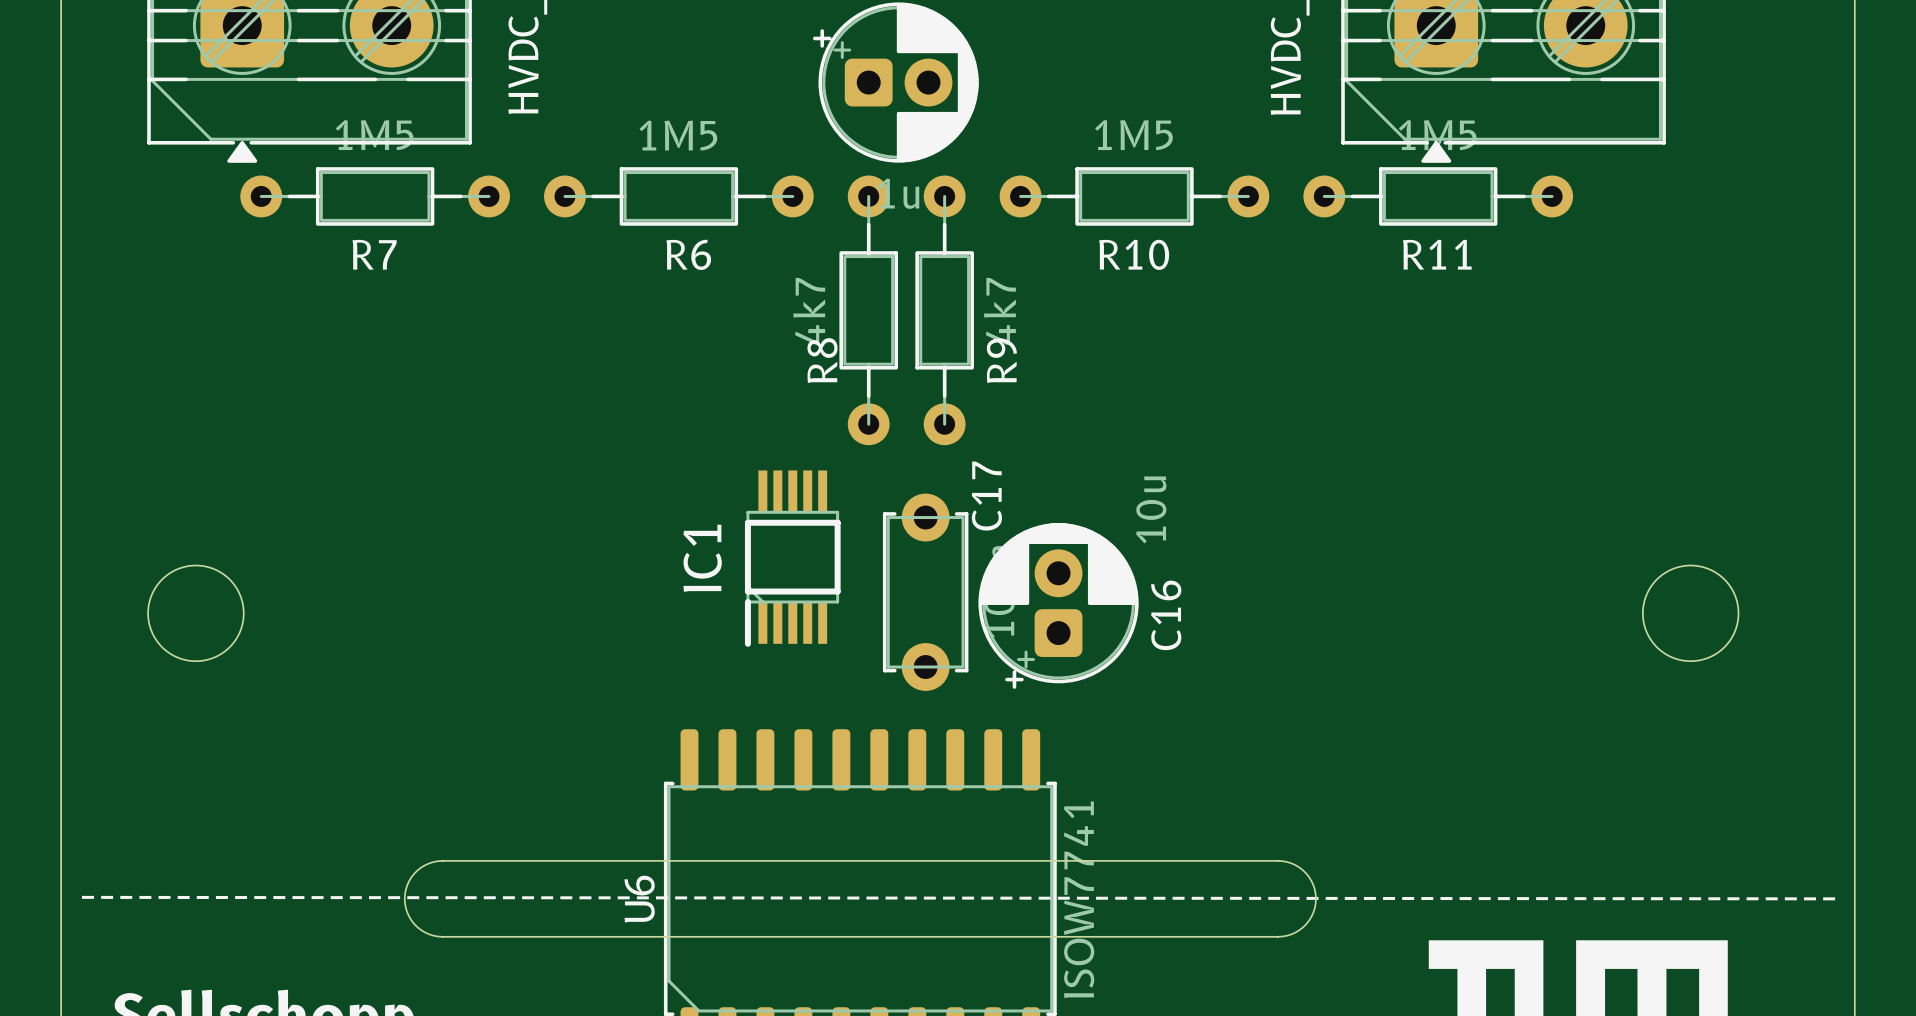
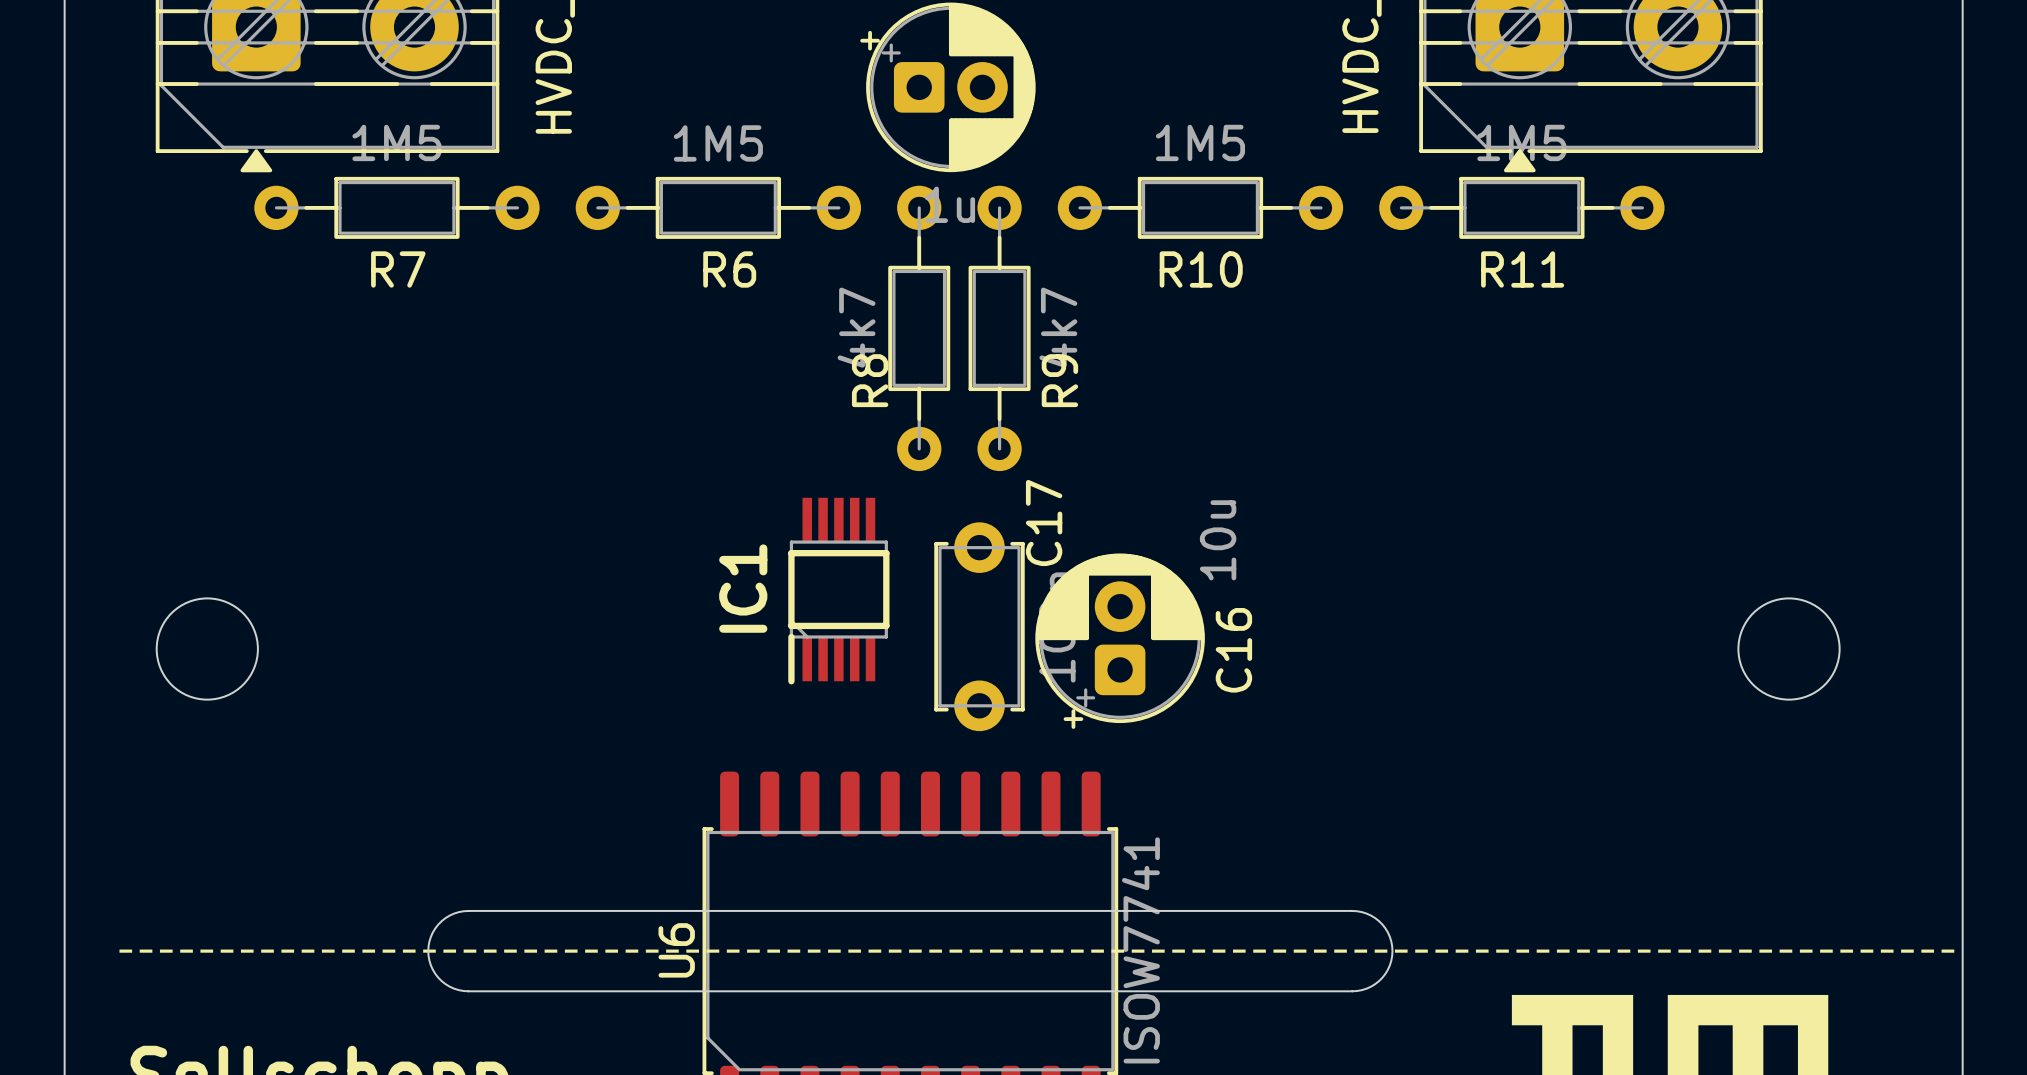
line: (82, 897) (1836, 898) -> none
line: none -> (119, 951) (1954, 951)

